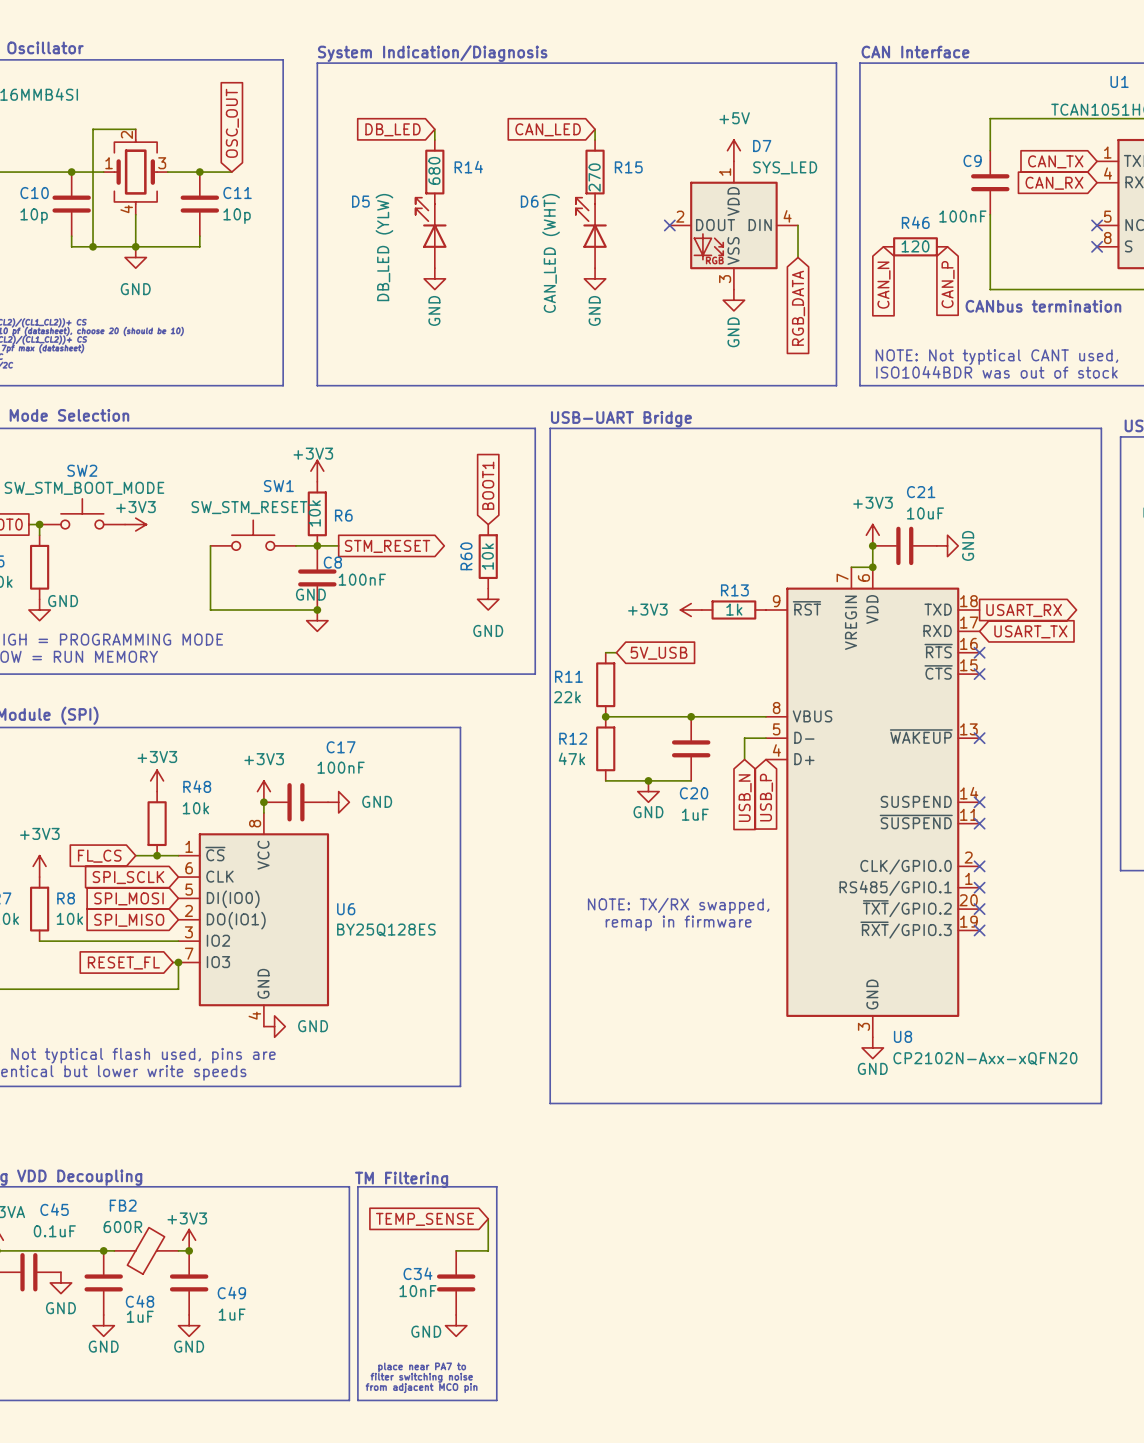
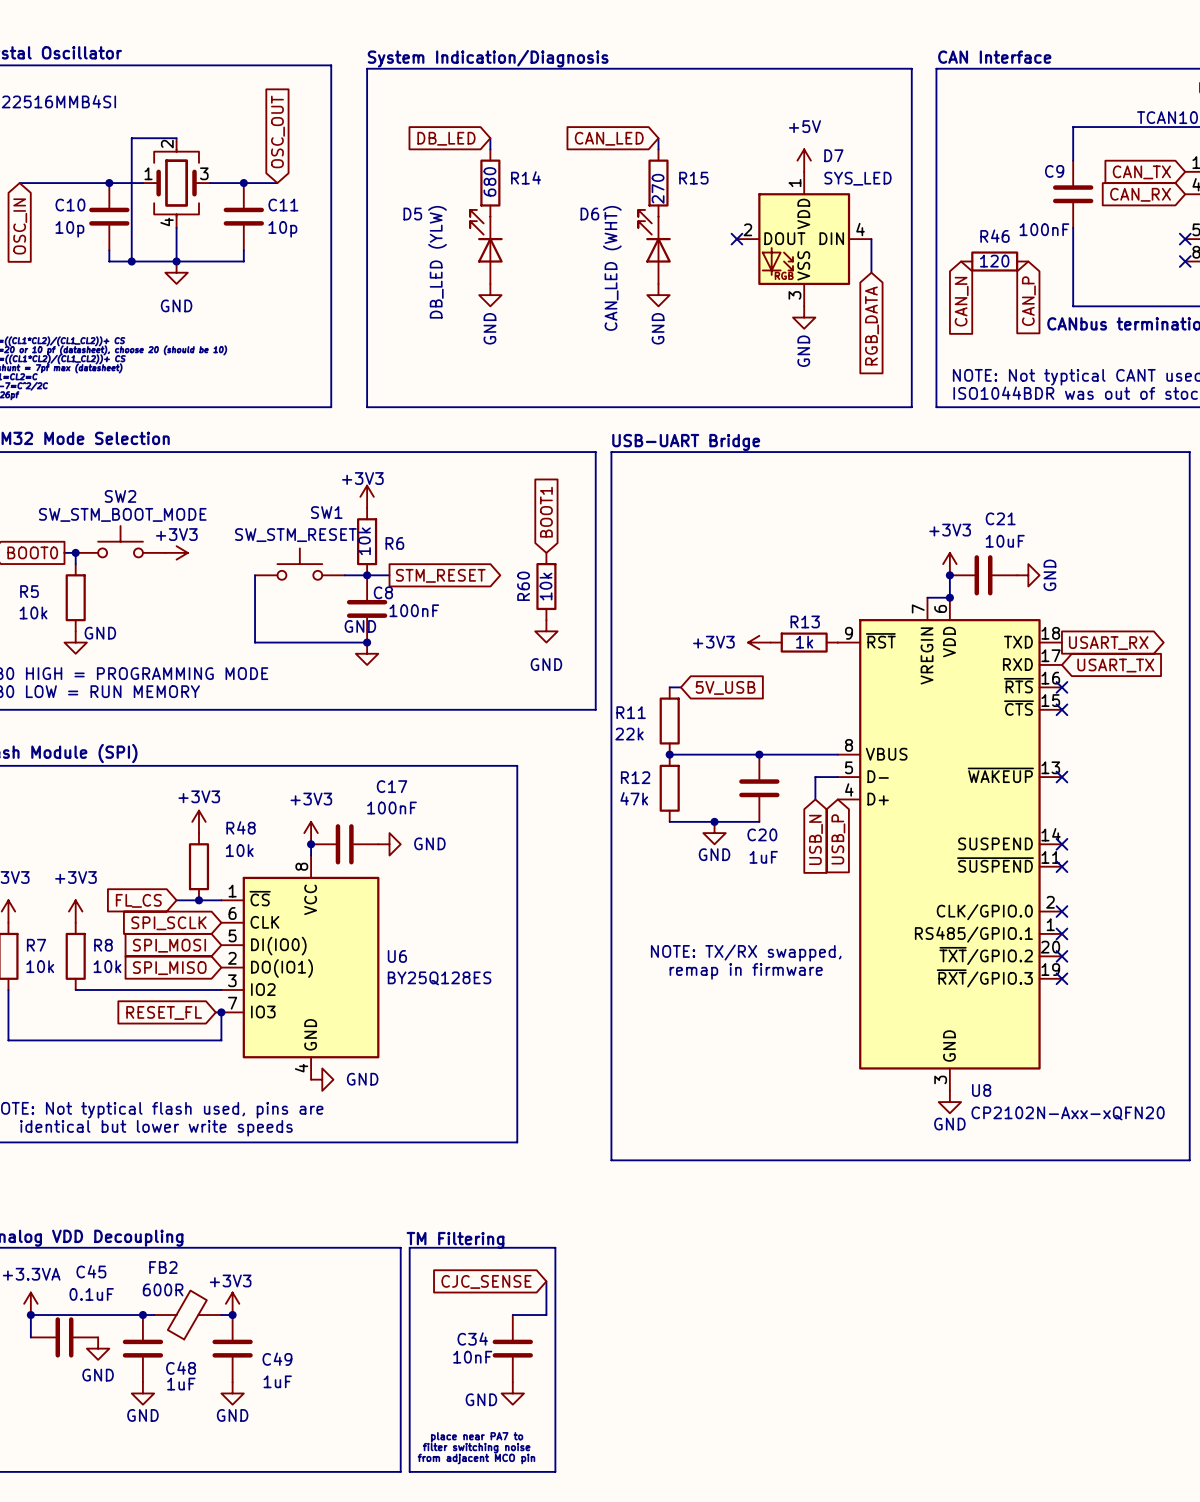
global label: TEMP_SENSE (425, 1219) -> CJC_SENSE (486, 1281)

